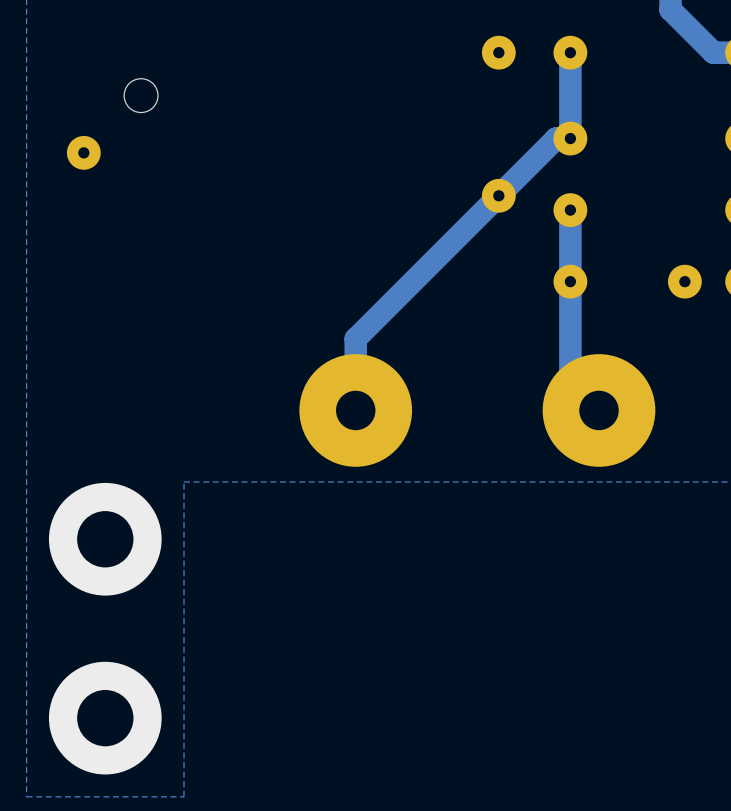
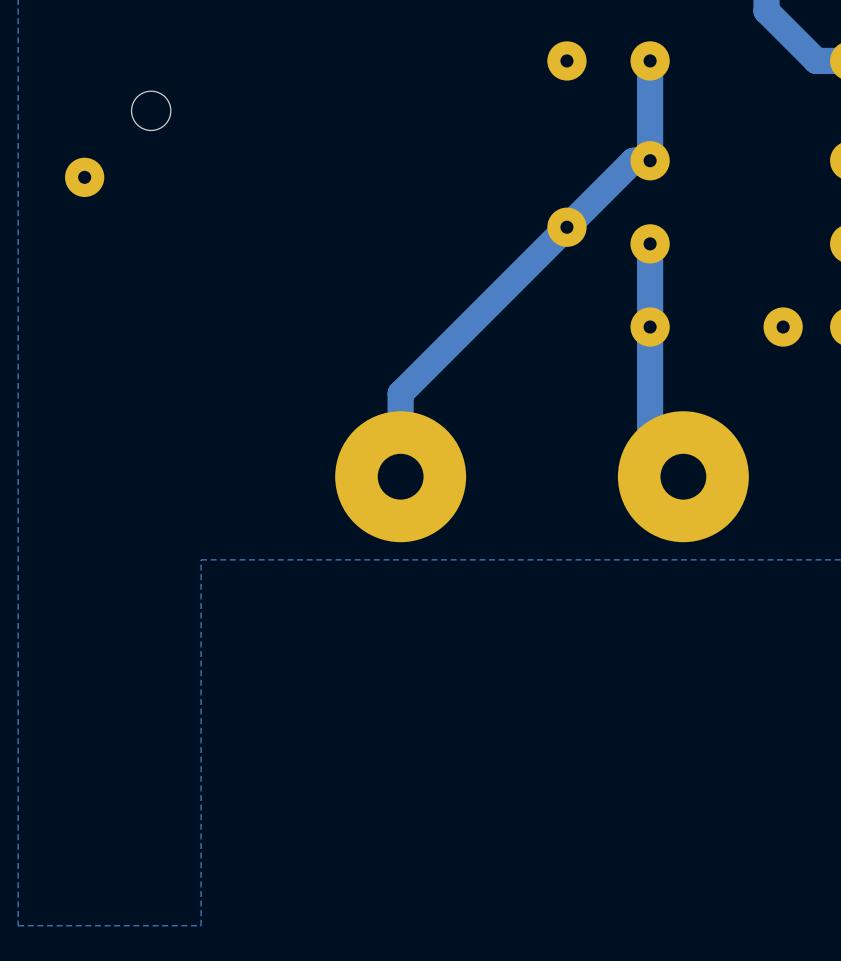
via: (105, 539) -> none
via: (105, 718) -> none

